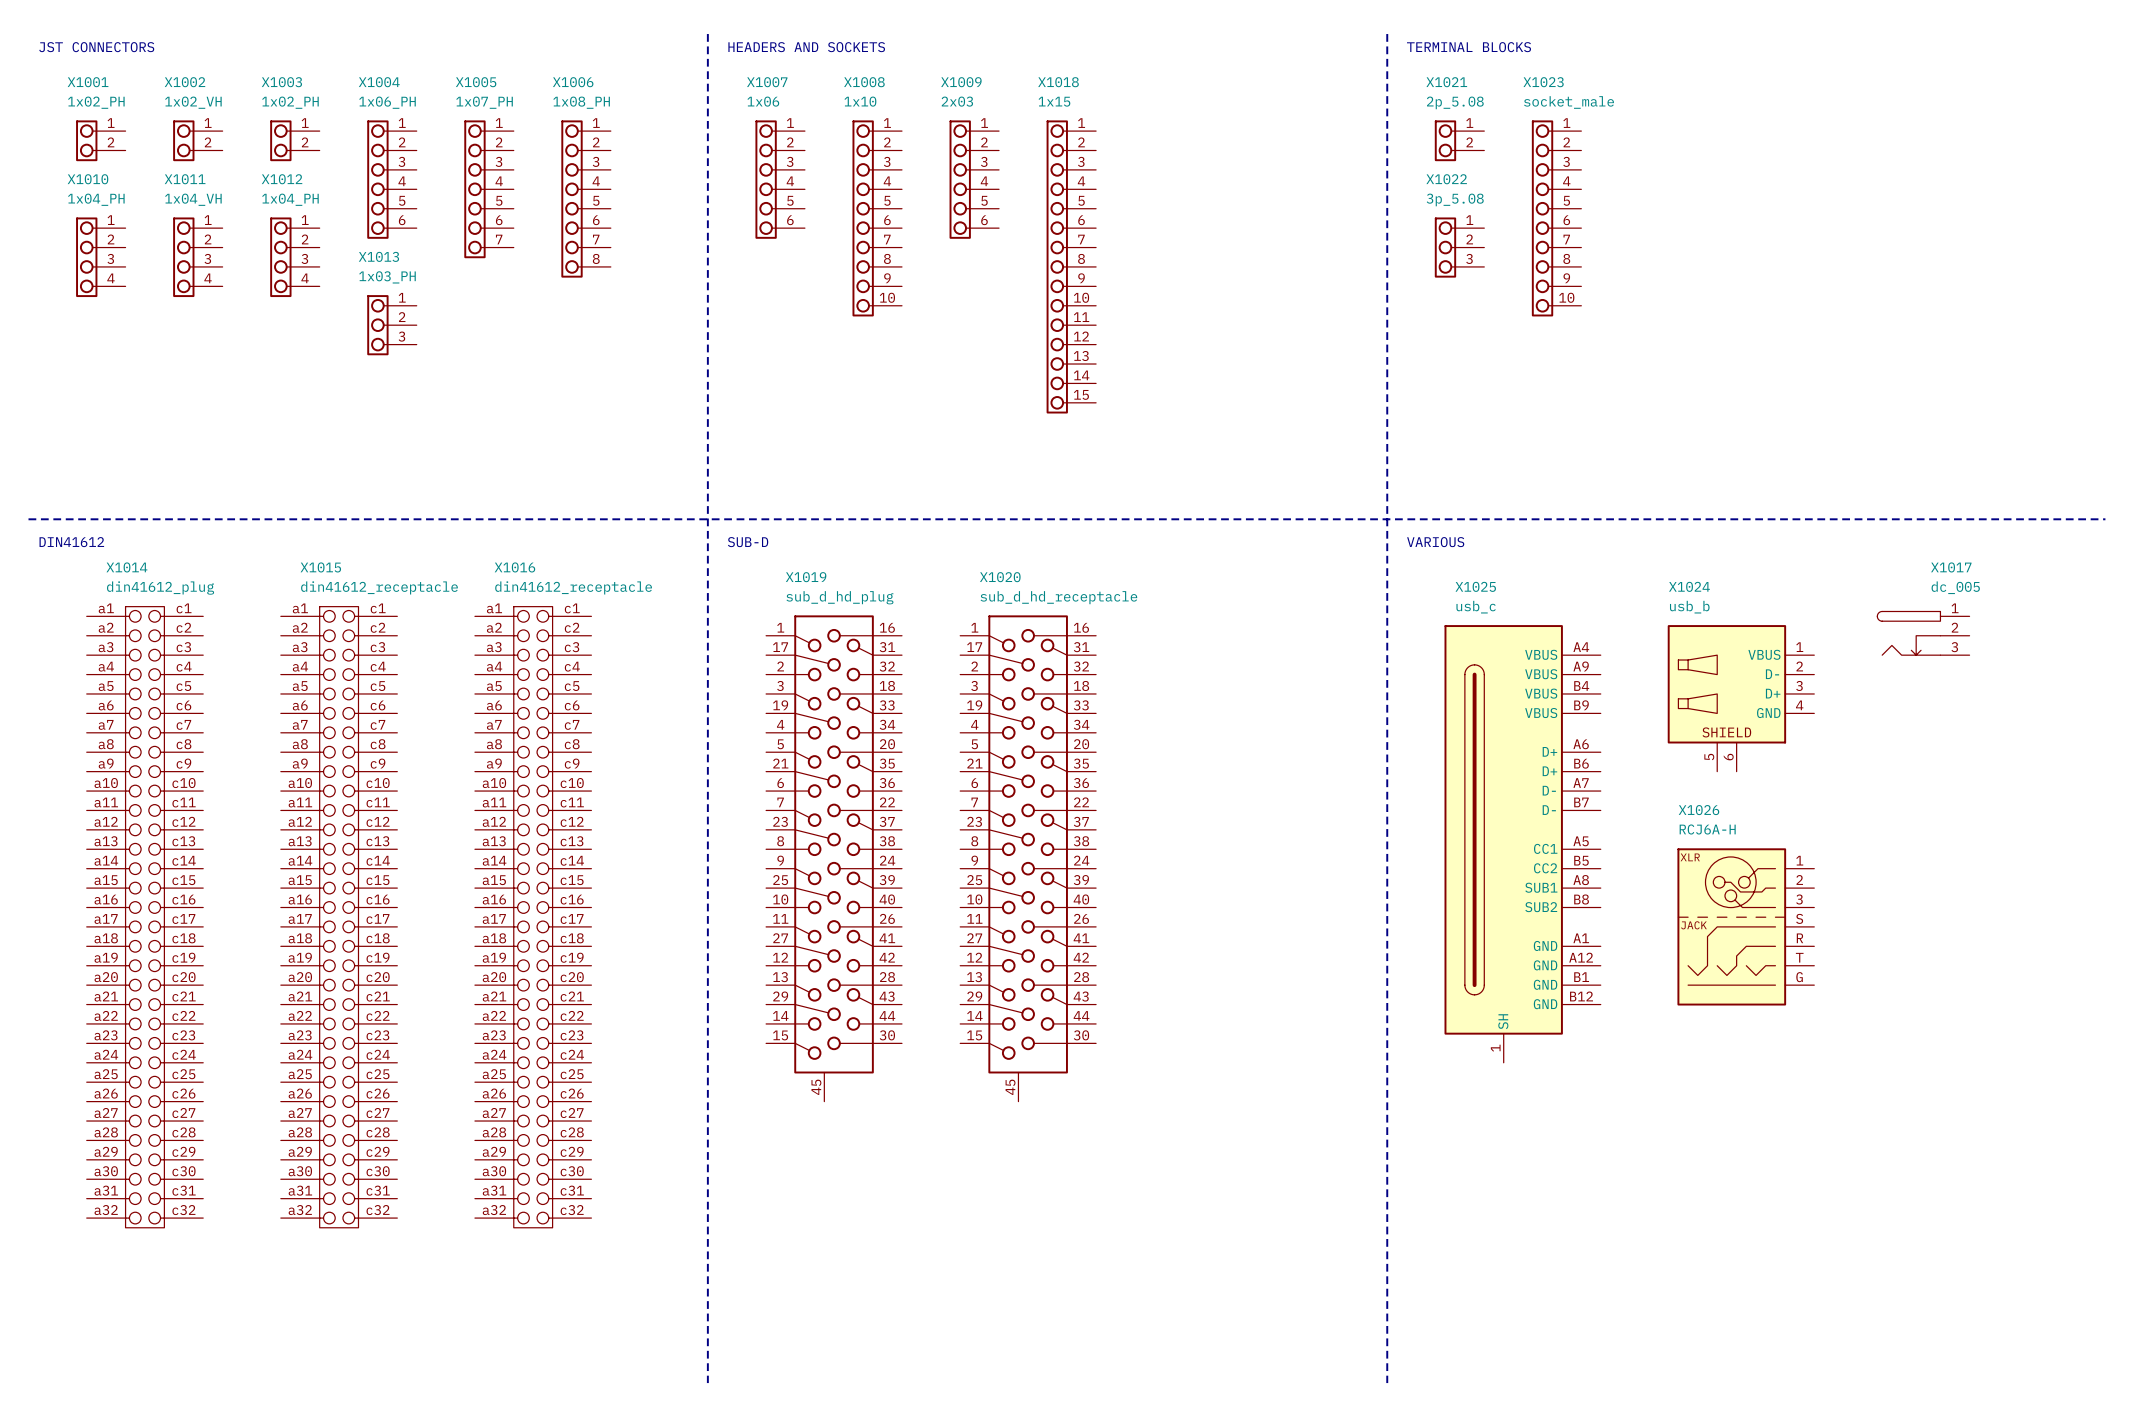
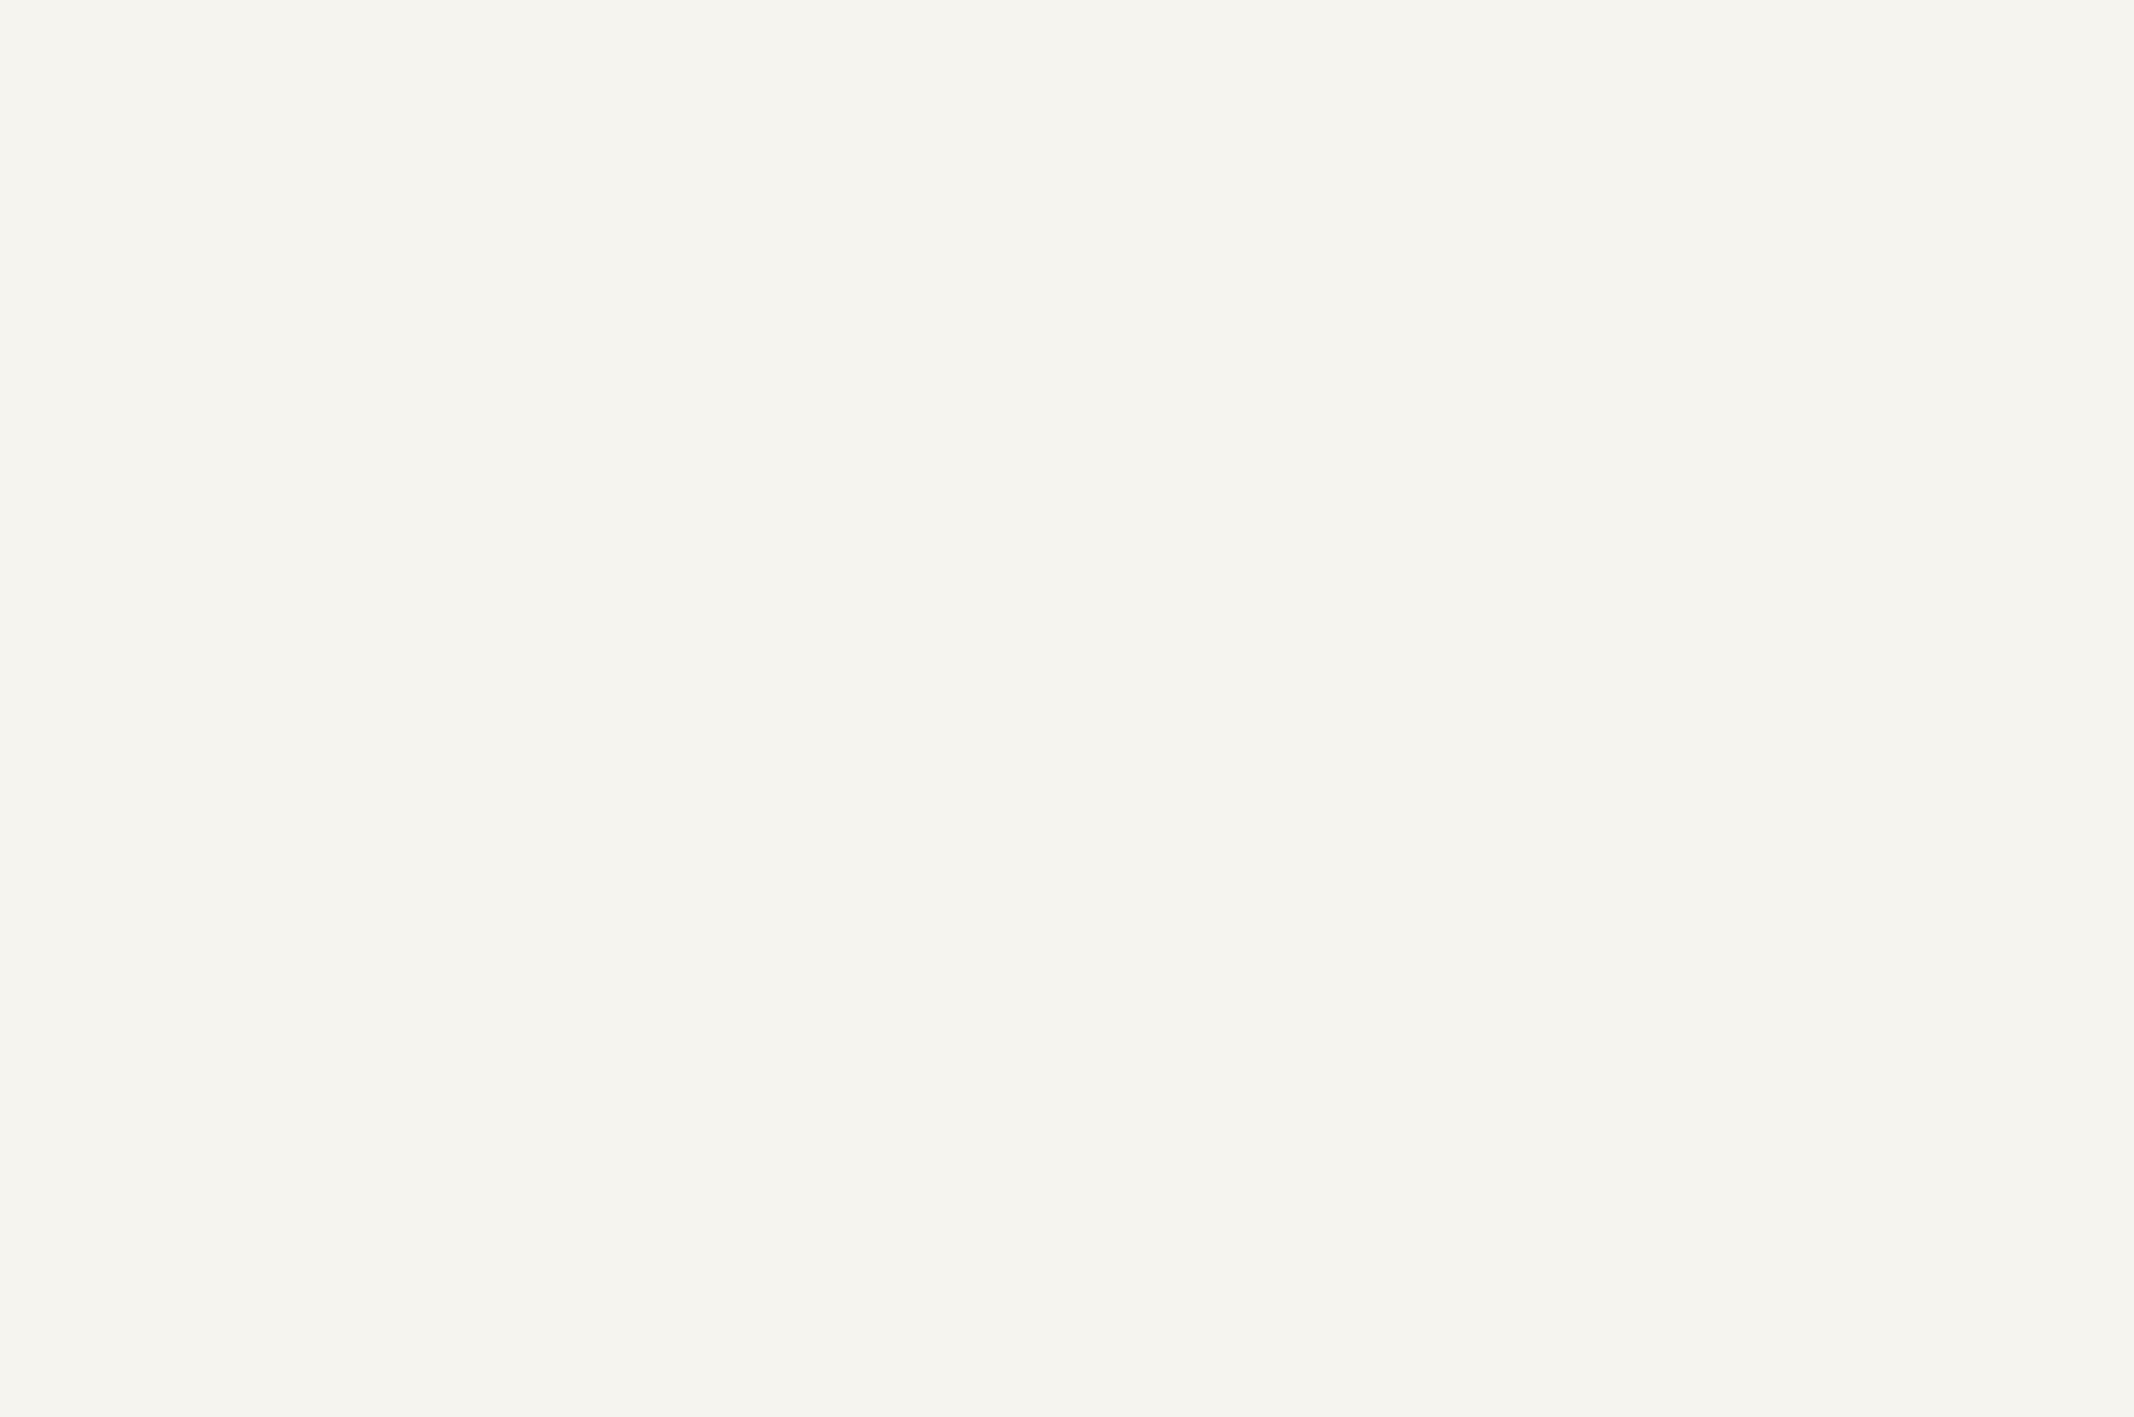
line: (707, 34) (707, 1383) -> none
line: (1387, 34) (1387, 1383) -> none
text: JST CONNECTORS (96, 47) -> none
text: HEADERS AND SOCKETS (806, 47) -> none
text: TERMINAL BLOCKS (1468, 47) -> none
X1001: 1x02_PH (100, 140) -> none
X1002: 1x02_VH (197, 140) -> none
X1003: 1x02_PH (294, 140) -> none
X1021: 2p_5.08 (1459, 140) -> none
X1004: 1x06_PH (391, 179) -> none
X1007: 1x06 (780, 179) -> none
X1009: 2x03 (974, 179) -> none
X1005: 1x07_PH (489, 189) -> none
X1006: 1x08_PH (586, 199) -> none
X1008: 1x10 (877, 218) -> none
X1023: socket_male (1556, 218) -> none
X1022: 3p_5.08 (1459, 247) -> none
X1010: 1x04_PH (100, 257) -> none
X1011: 1x04_VH (197, 257) -> none
X1012: 1x04_PH (294, 257) -> none
X1018: 1x15 (1071, 266) -> none
X1013: 1x03_PH (391, 325) -> none
line: (28, 519) (2105, 519) -> none
text: DIN41612 (71, 542) -> none
text: SUB-D (748, 542) -> none
text: VARIOUS (1435, 542) -> none
X1017: dc_005 (1923, 633) -> none
X1024: usb_b (1740, 698) -> none
X1025: usb_c (1522, 843) -> none
X1019: sub_d_hd_plug (834, 858) -> none
X1020: sub_d_hd_receptacle (1028, 858) -> none
X1014: din41612_plug (144, 917) -> none
X1015: din41612_receptacle (339, 917) -> none
X1016: din41612_receptacle (533, 917) -> none
X1026: RCJ6A-H (1745, 926) -> none

